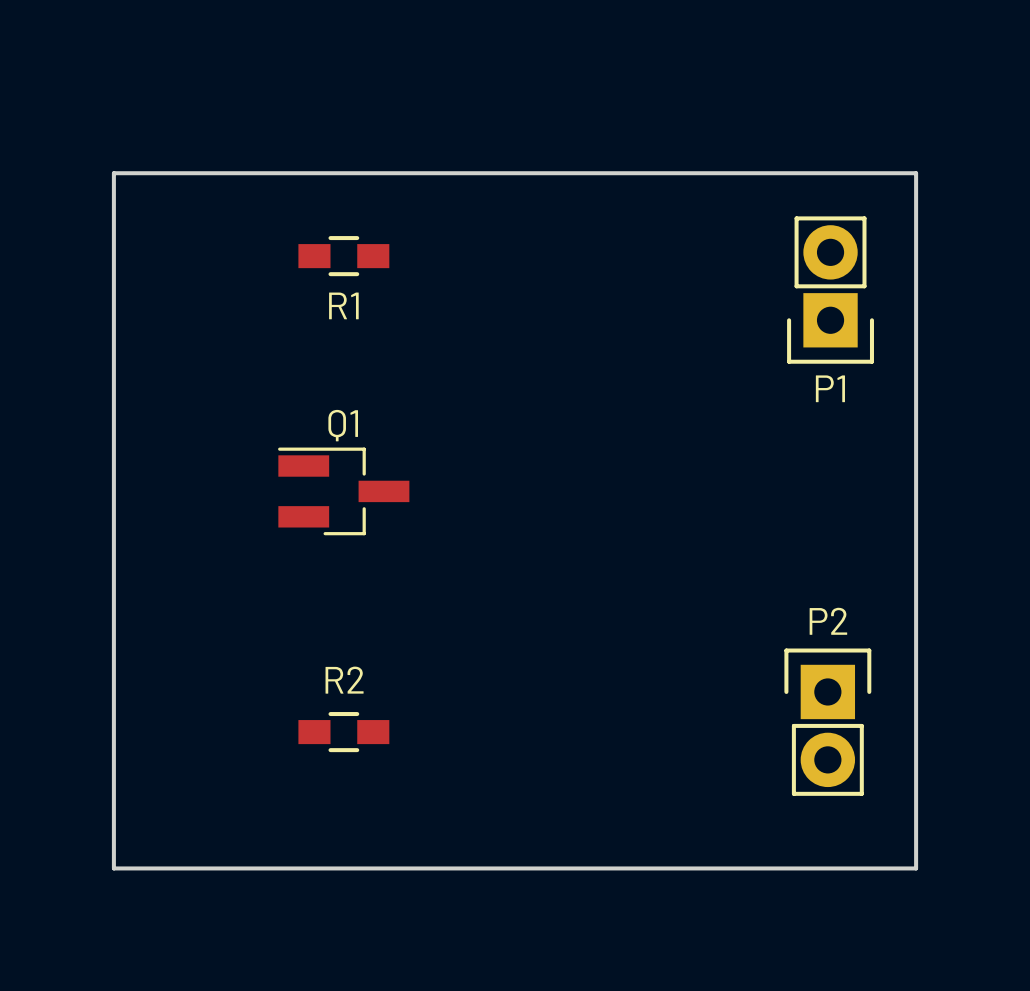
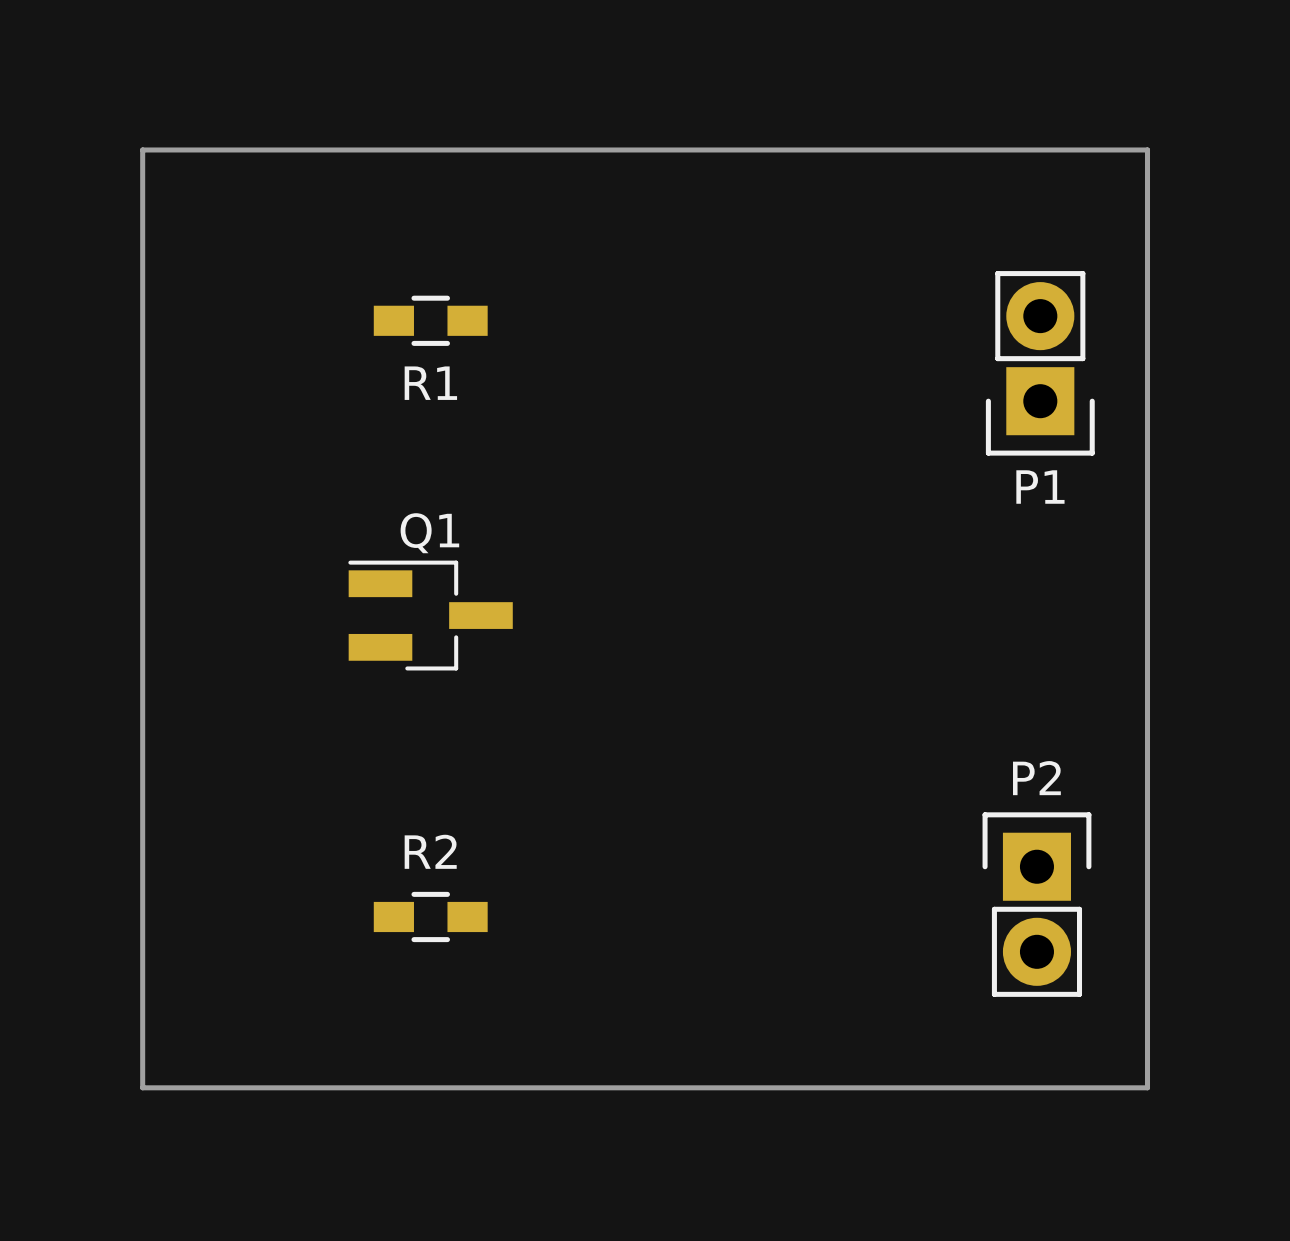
board edge: (113, 173) (916, 173) -> (142, 216) (142, 149) (1147, 149) (1147, 216)

